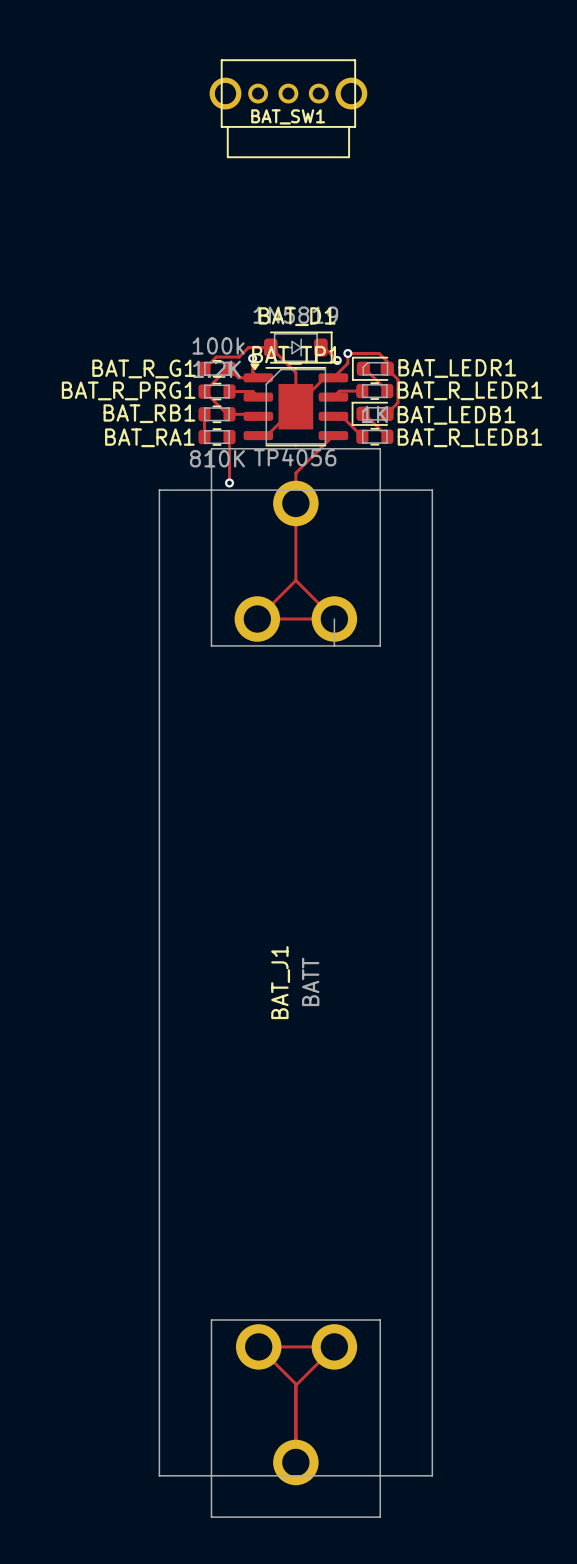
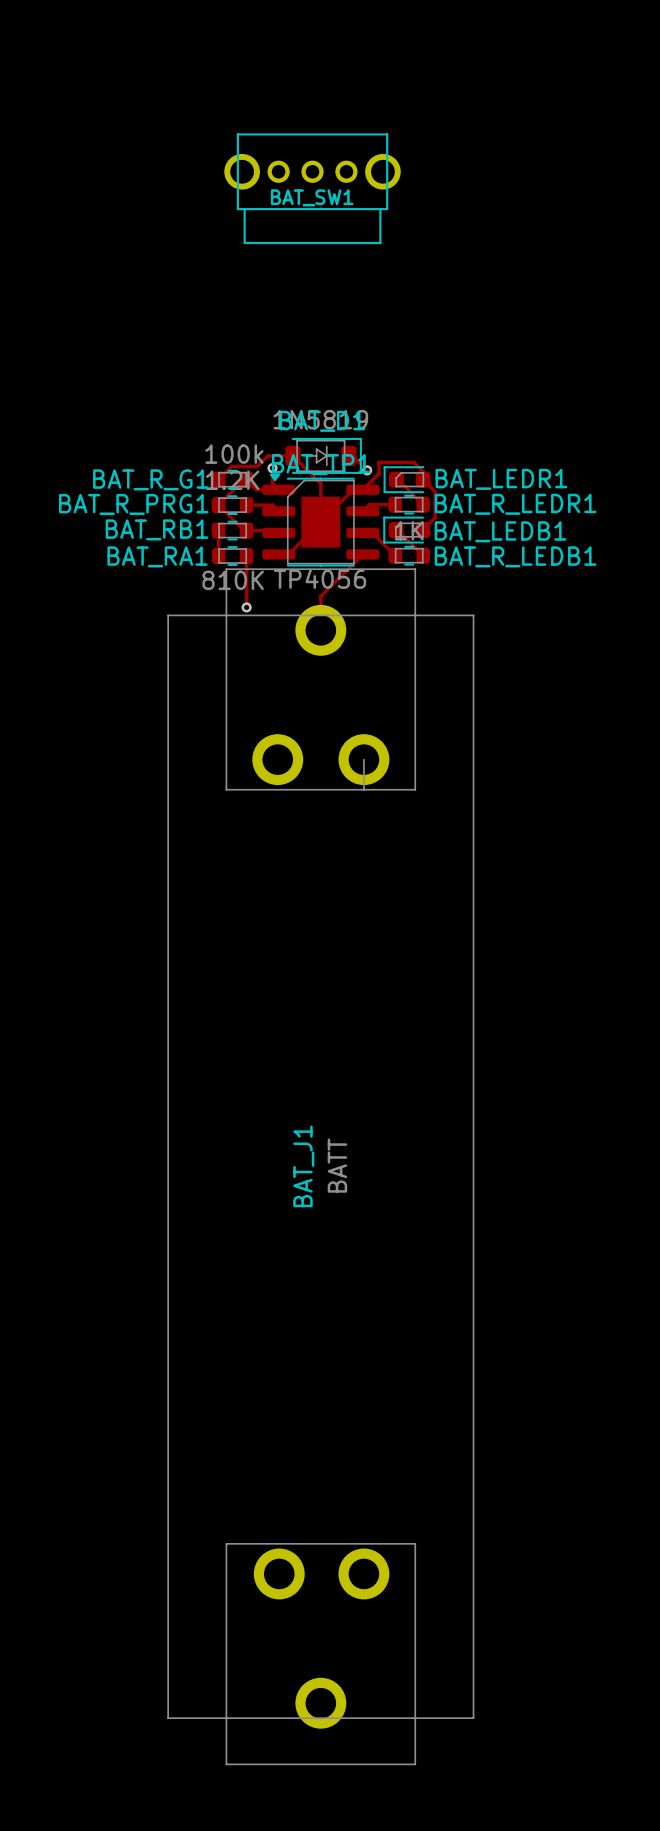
via: (347, 353) -> none
track: (295, 503) (295, 580) -> none
track: (295, 580) (257, 619) (334, 619) (295, 580) -> none
track: (295, 1385) (334, 1346) (258, 1346) (295, 1384) (295, 1462) -> none

